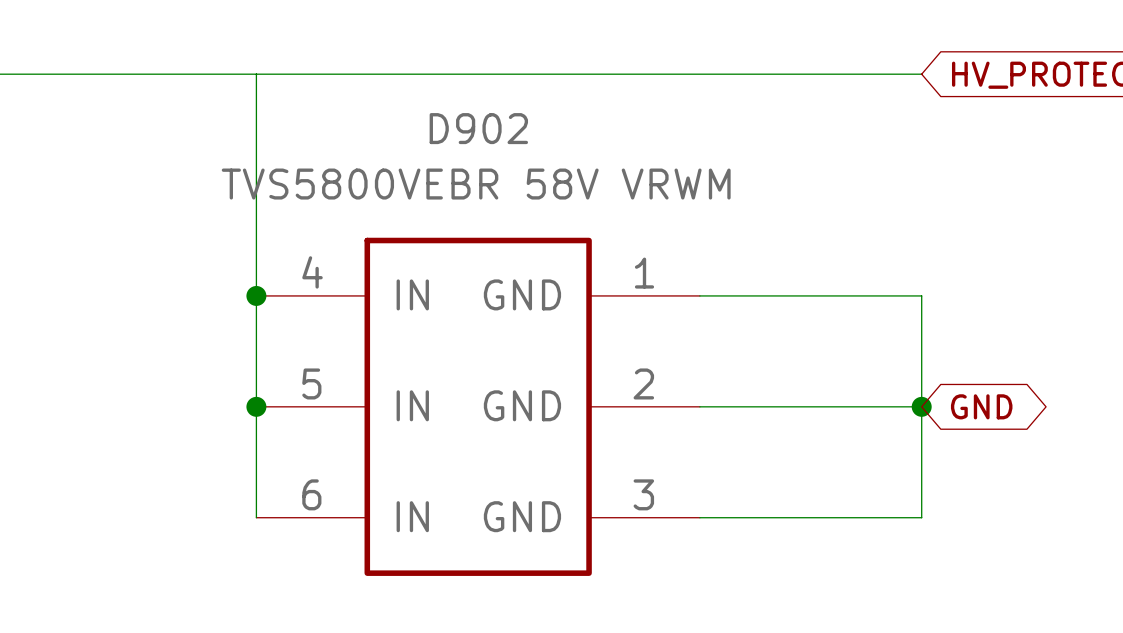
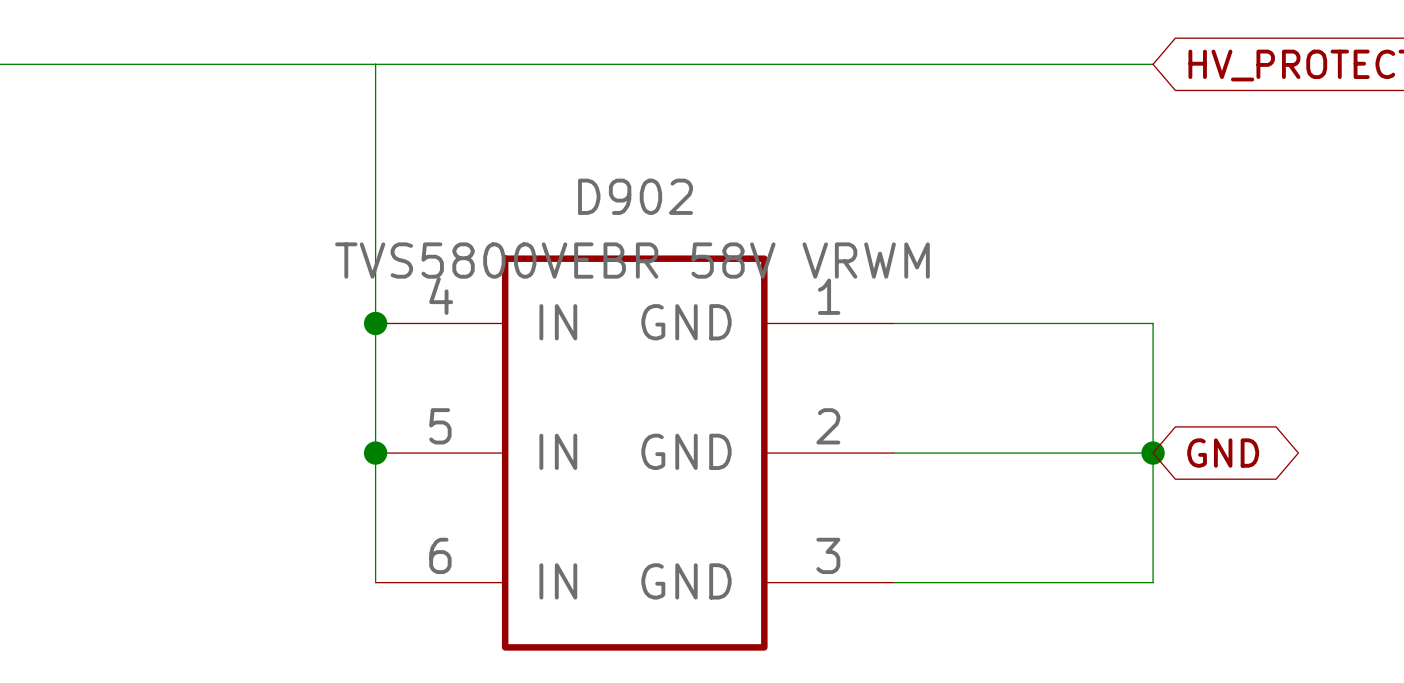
D902 name position: D902 (478, 128) -> D902 (635, 196)
D902 value position: TVS5800VEBR 58V VRWM (476, 184) -> TVS5800VEBR 58V VRWM (632, 260)

